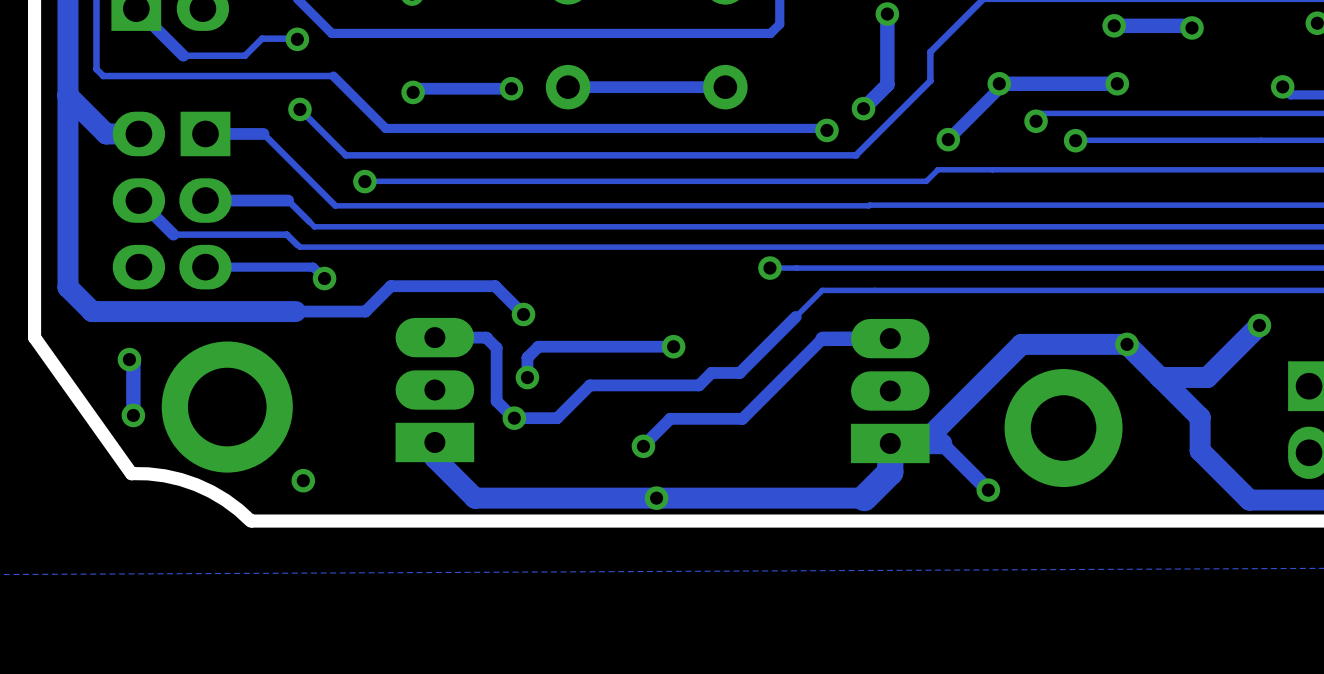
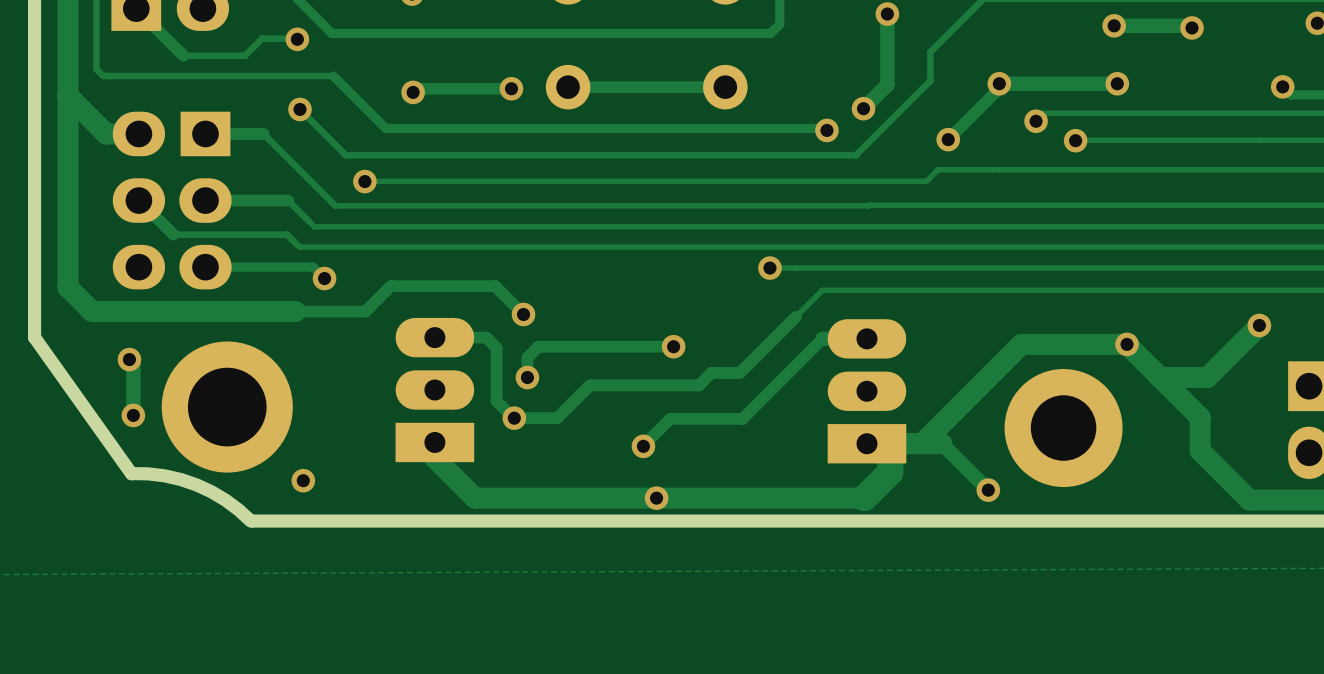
part position: (890, 391) -> (866, 391)

